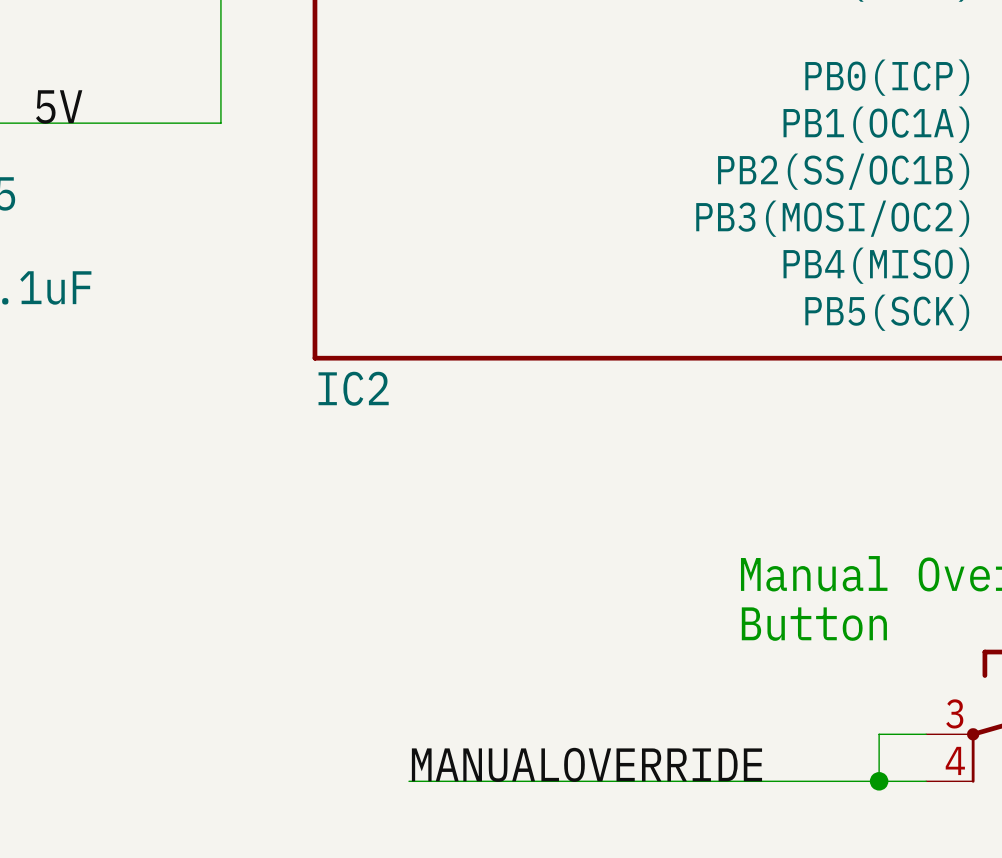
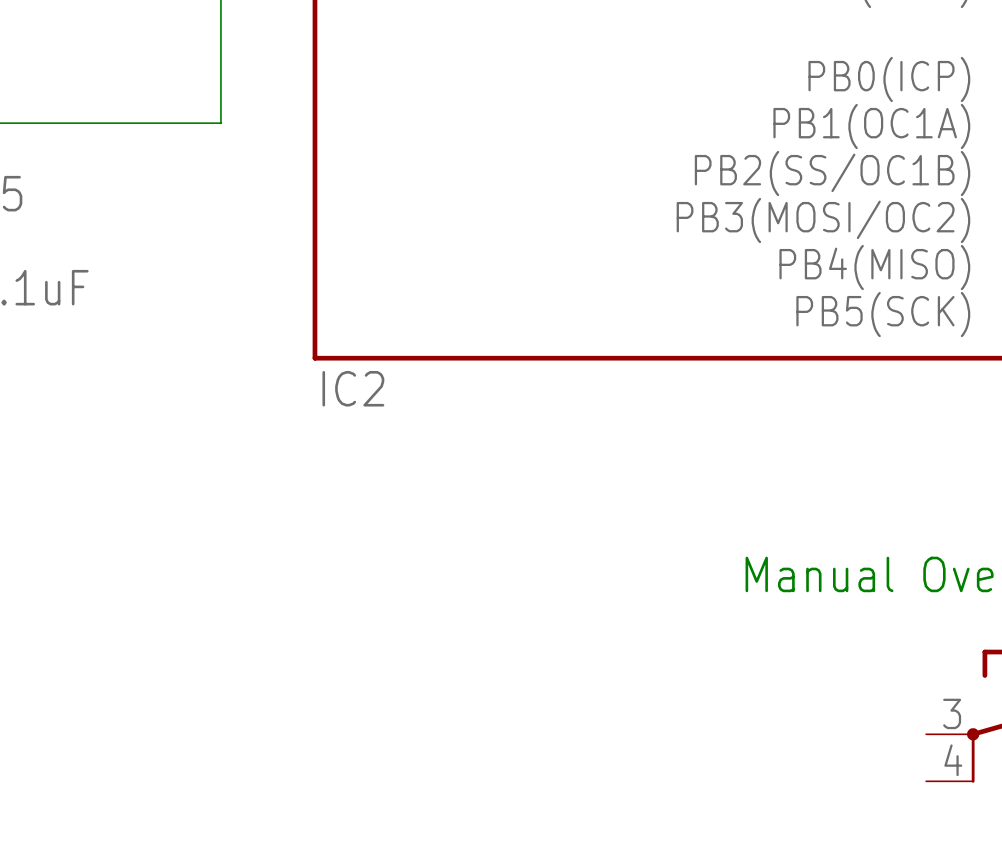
label: 5V (59, 106) -> none
text: Button (814, 624) -> none
wire: (926, 734) (879, 734) (879, 781) -> none
label: MANUALOVERRIDE (586, 764) -> none
wire: (409, 781) (926, 781) -> none
junction: (879, 781) -> none

